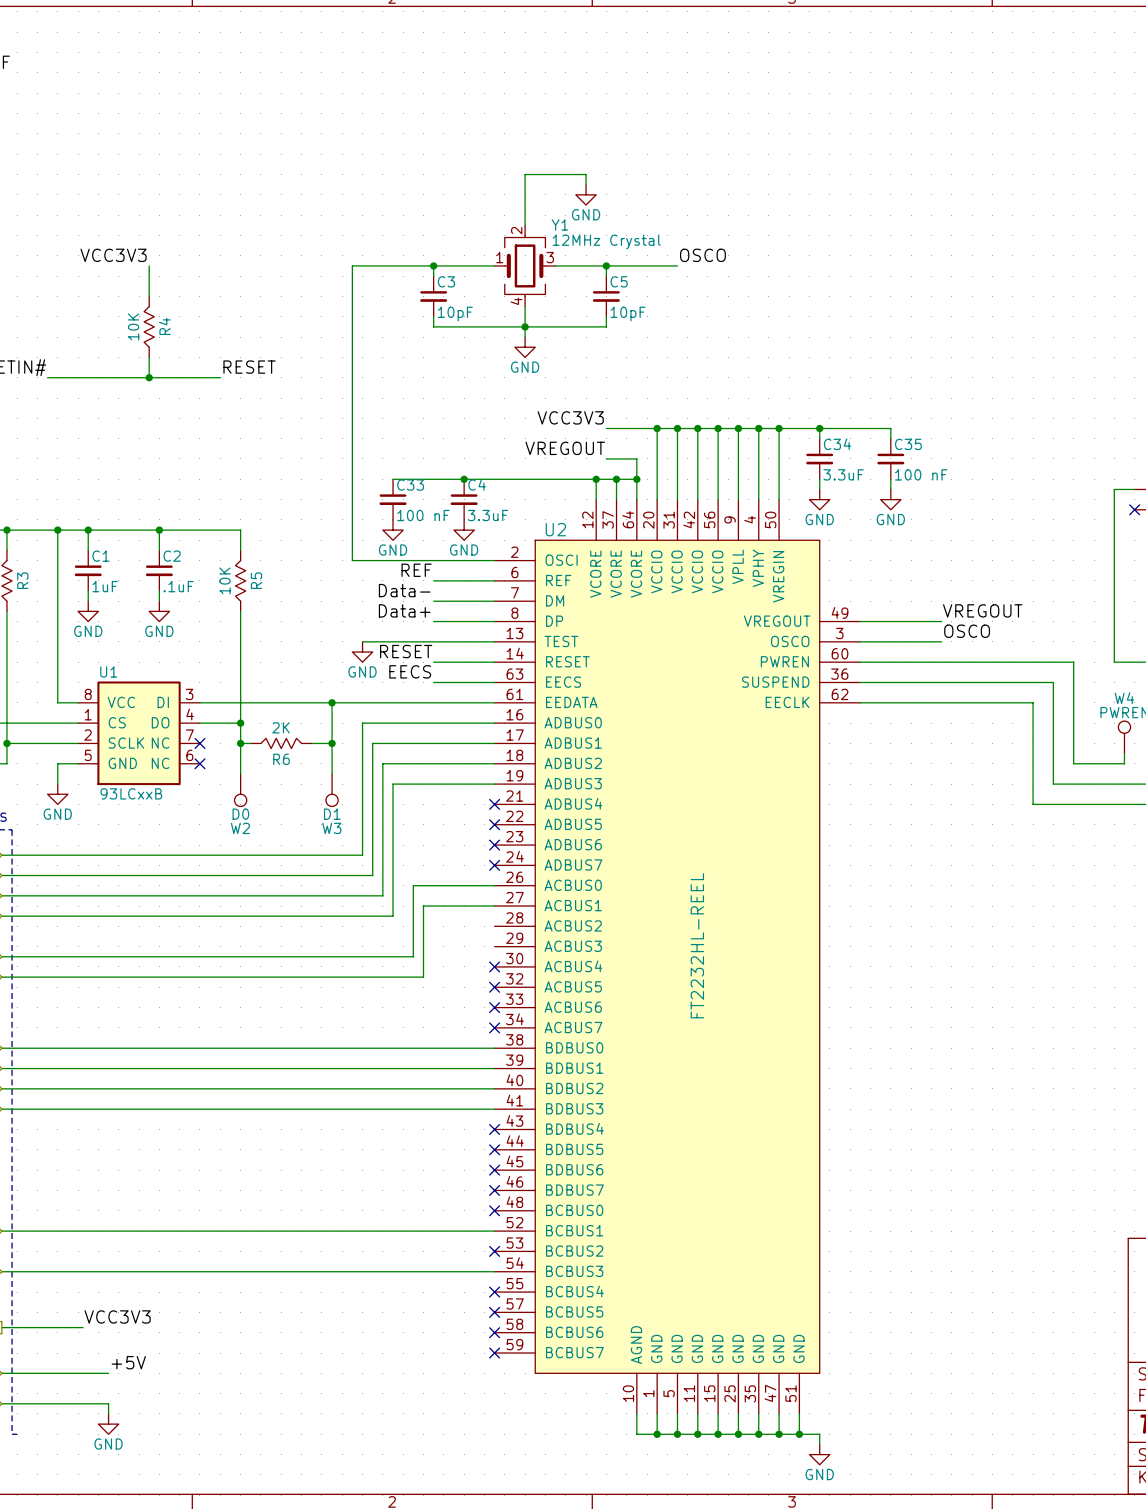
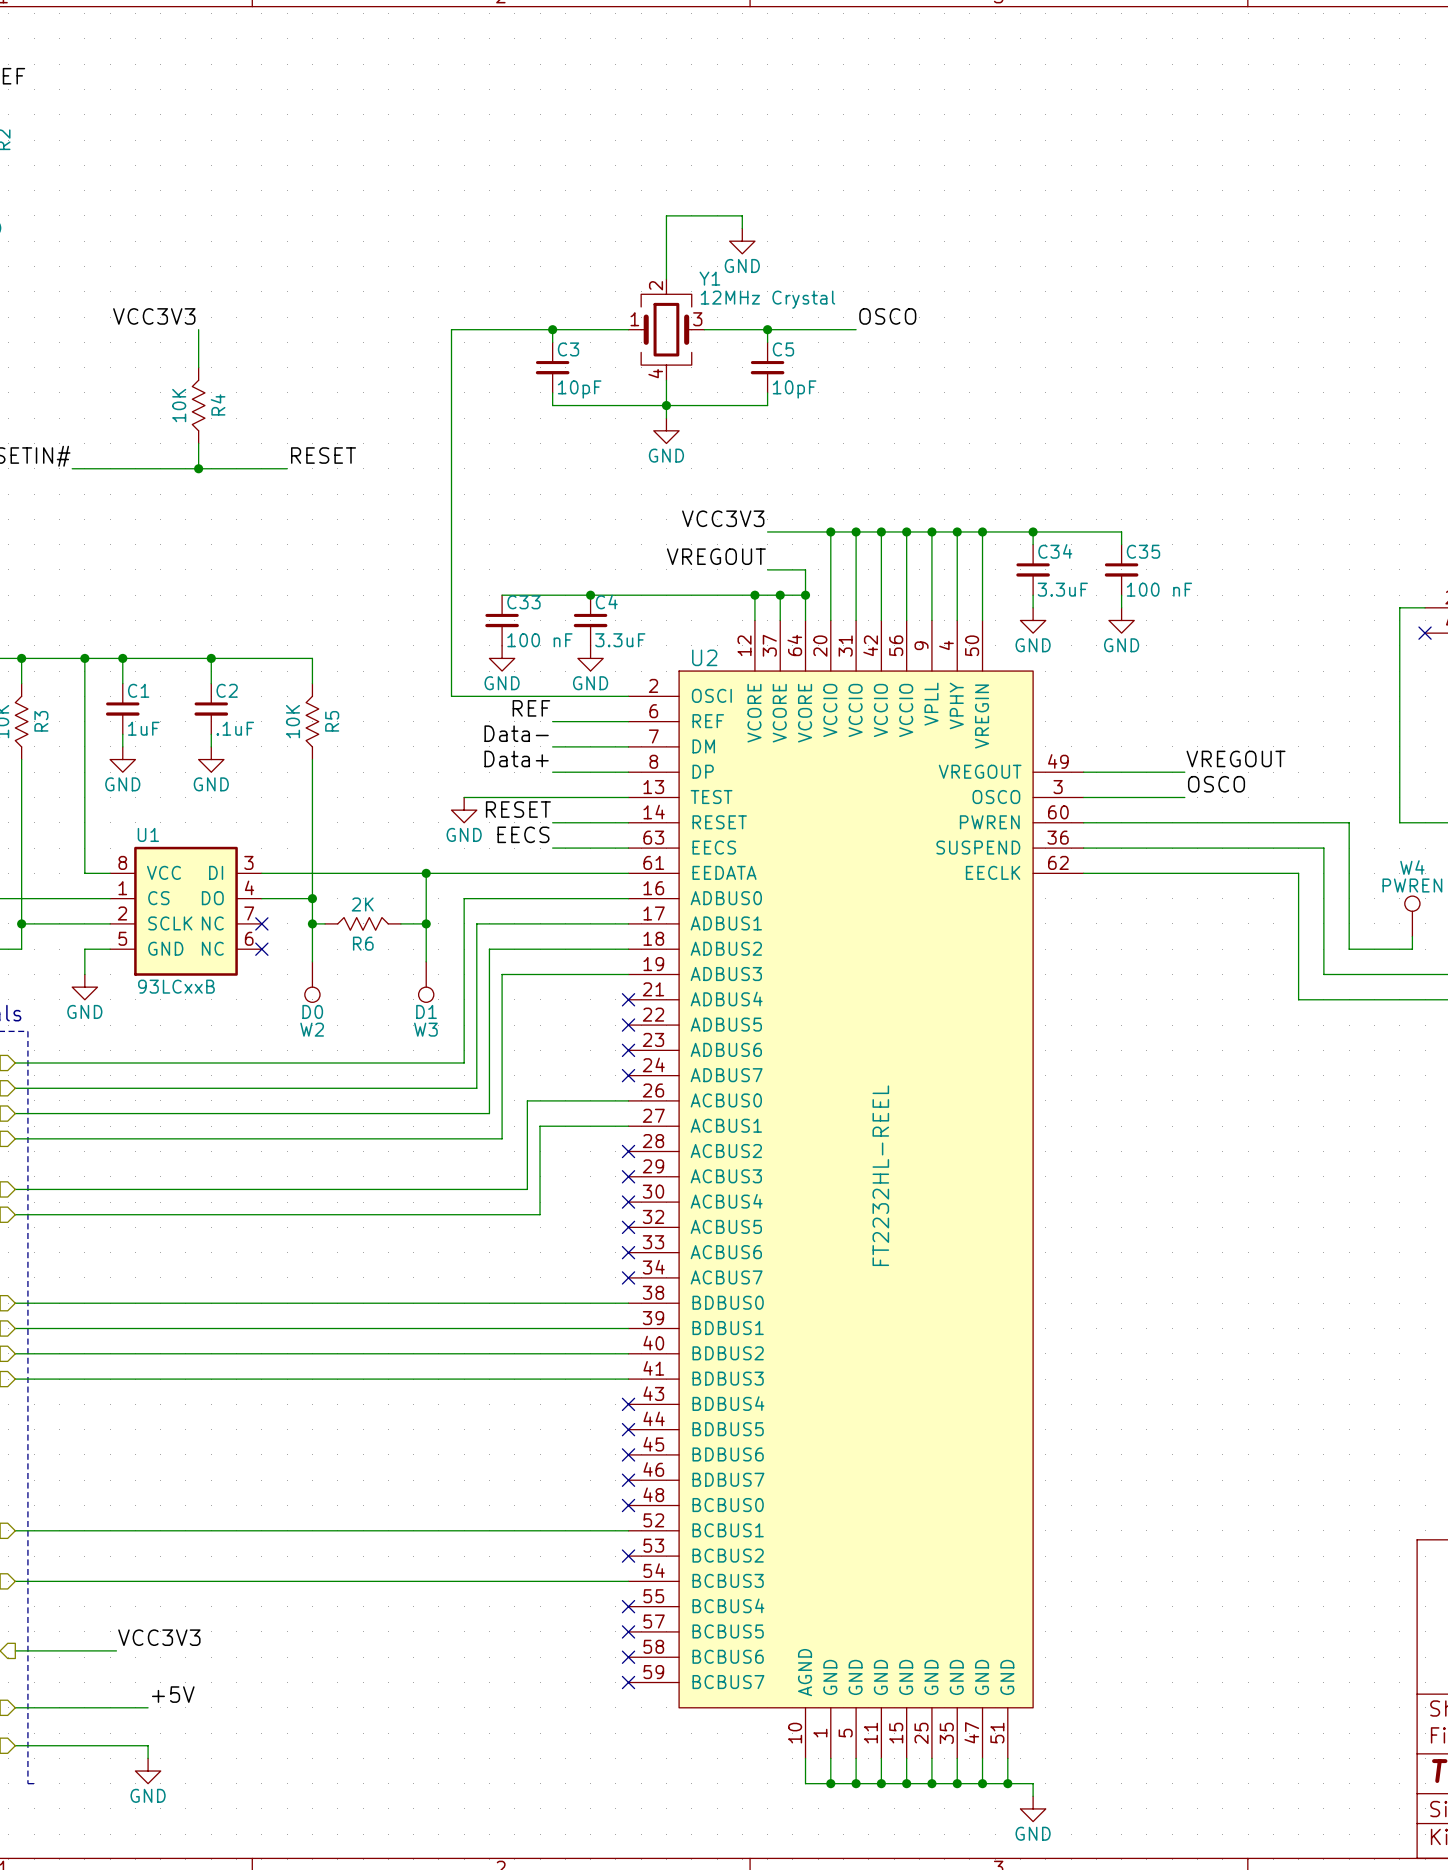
no-connect mark: none -> (628, 1151)
no-connect mark: none -> (628, 1176)

